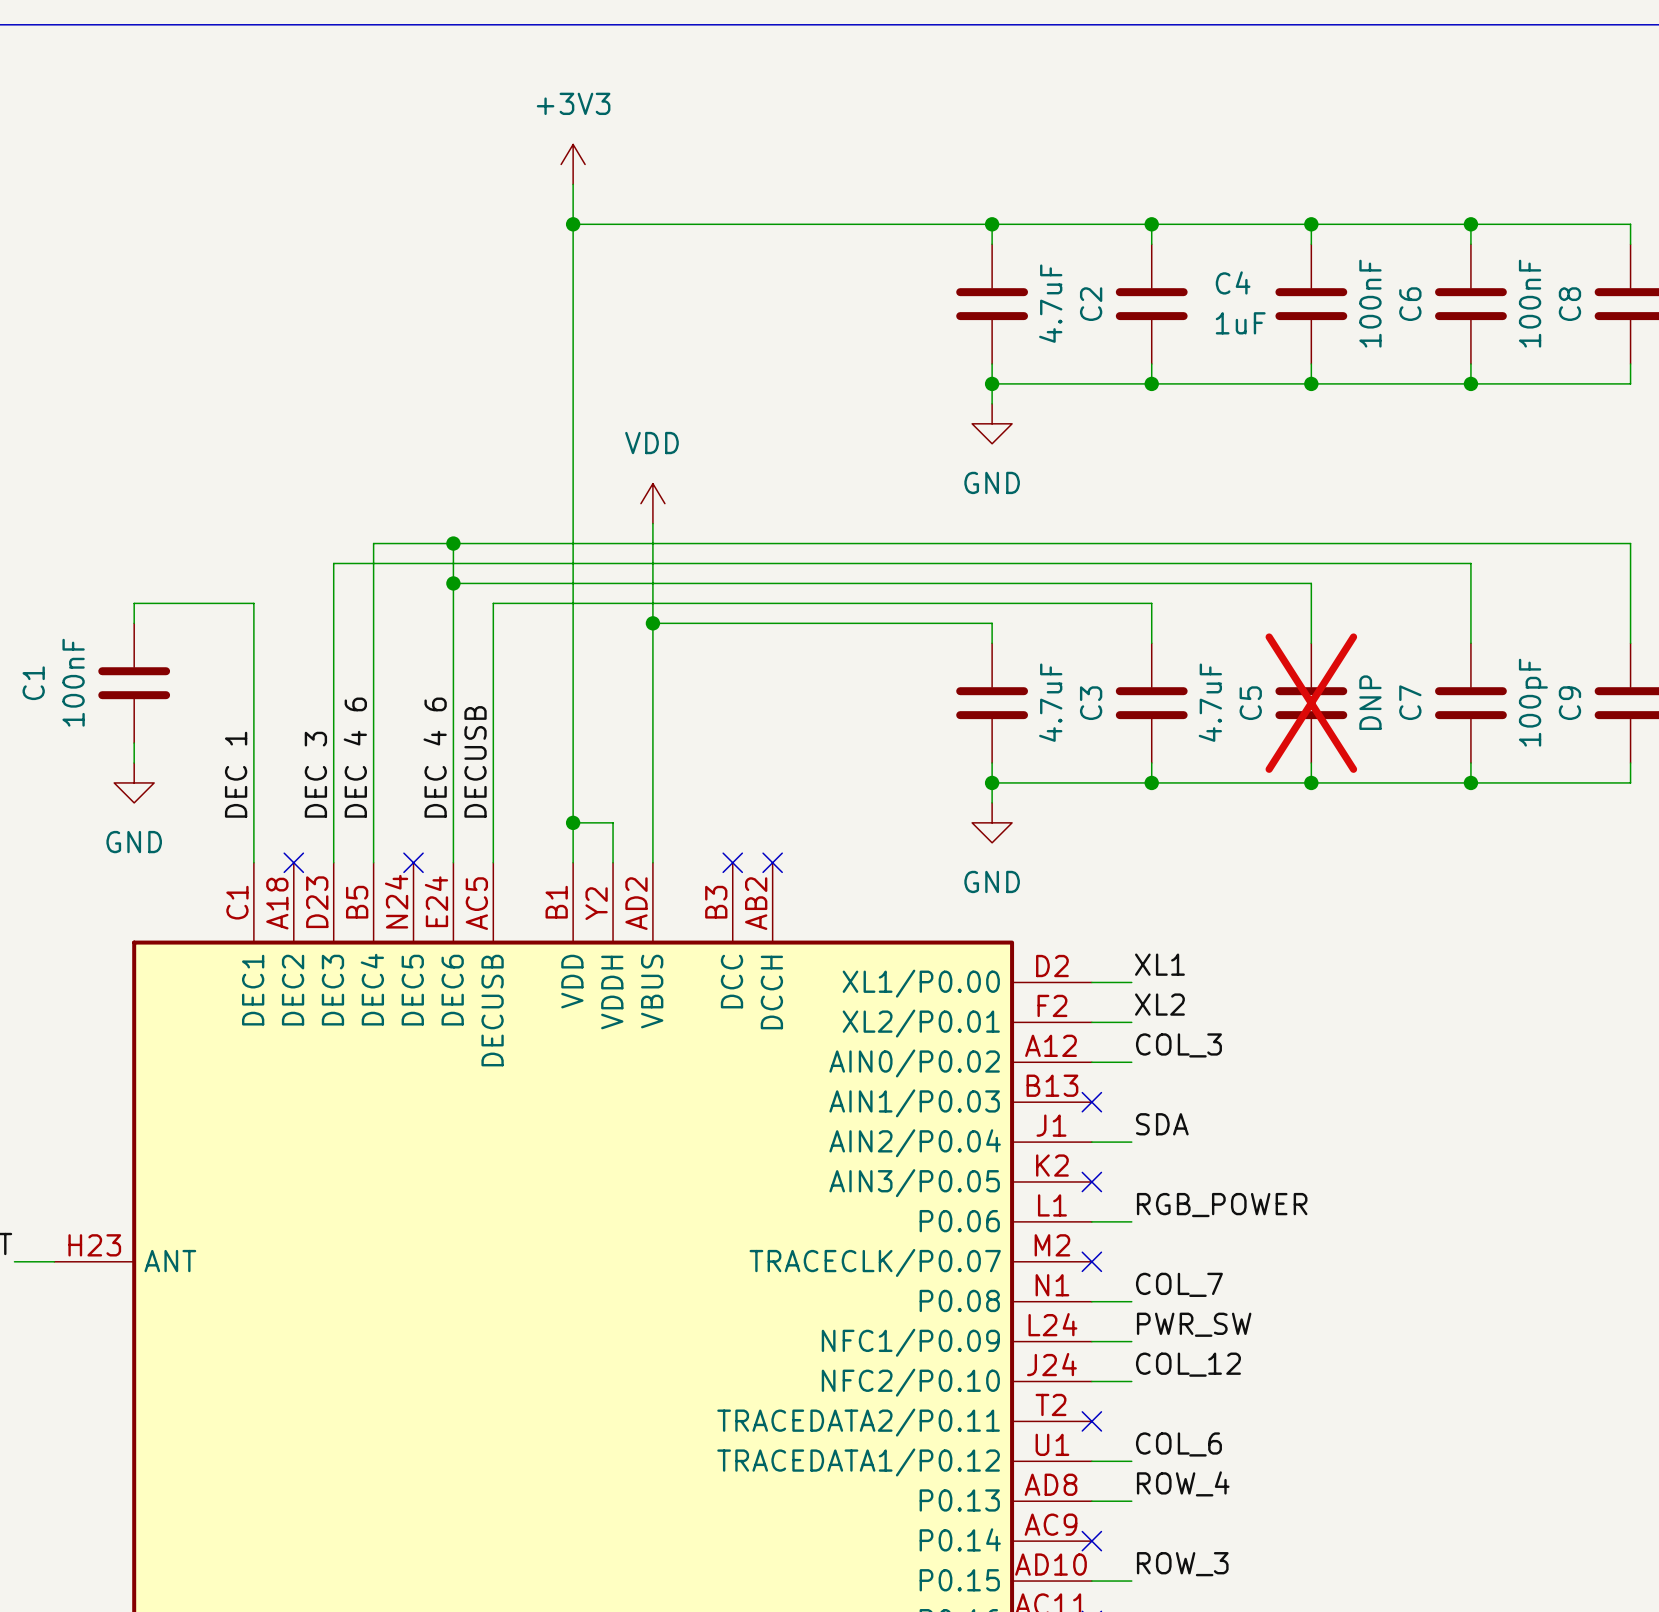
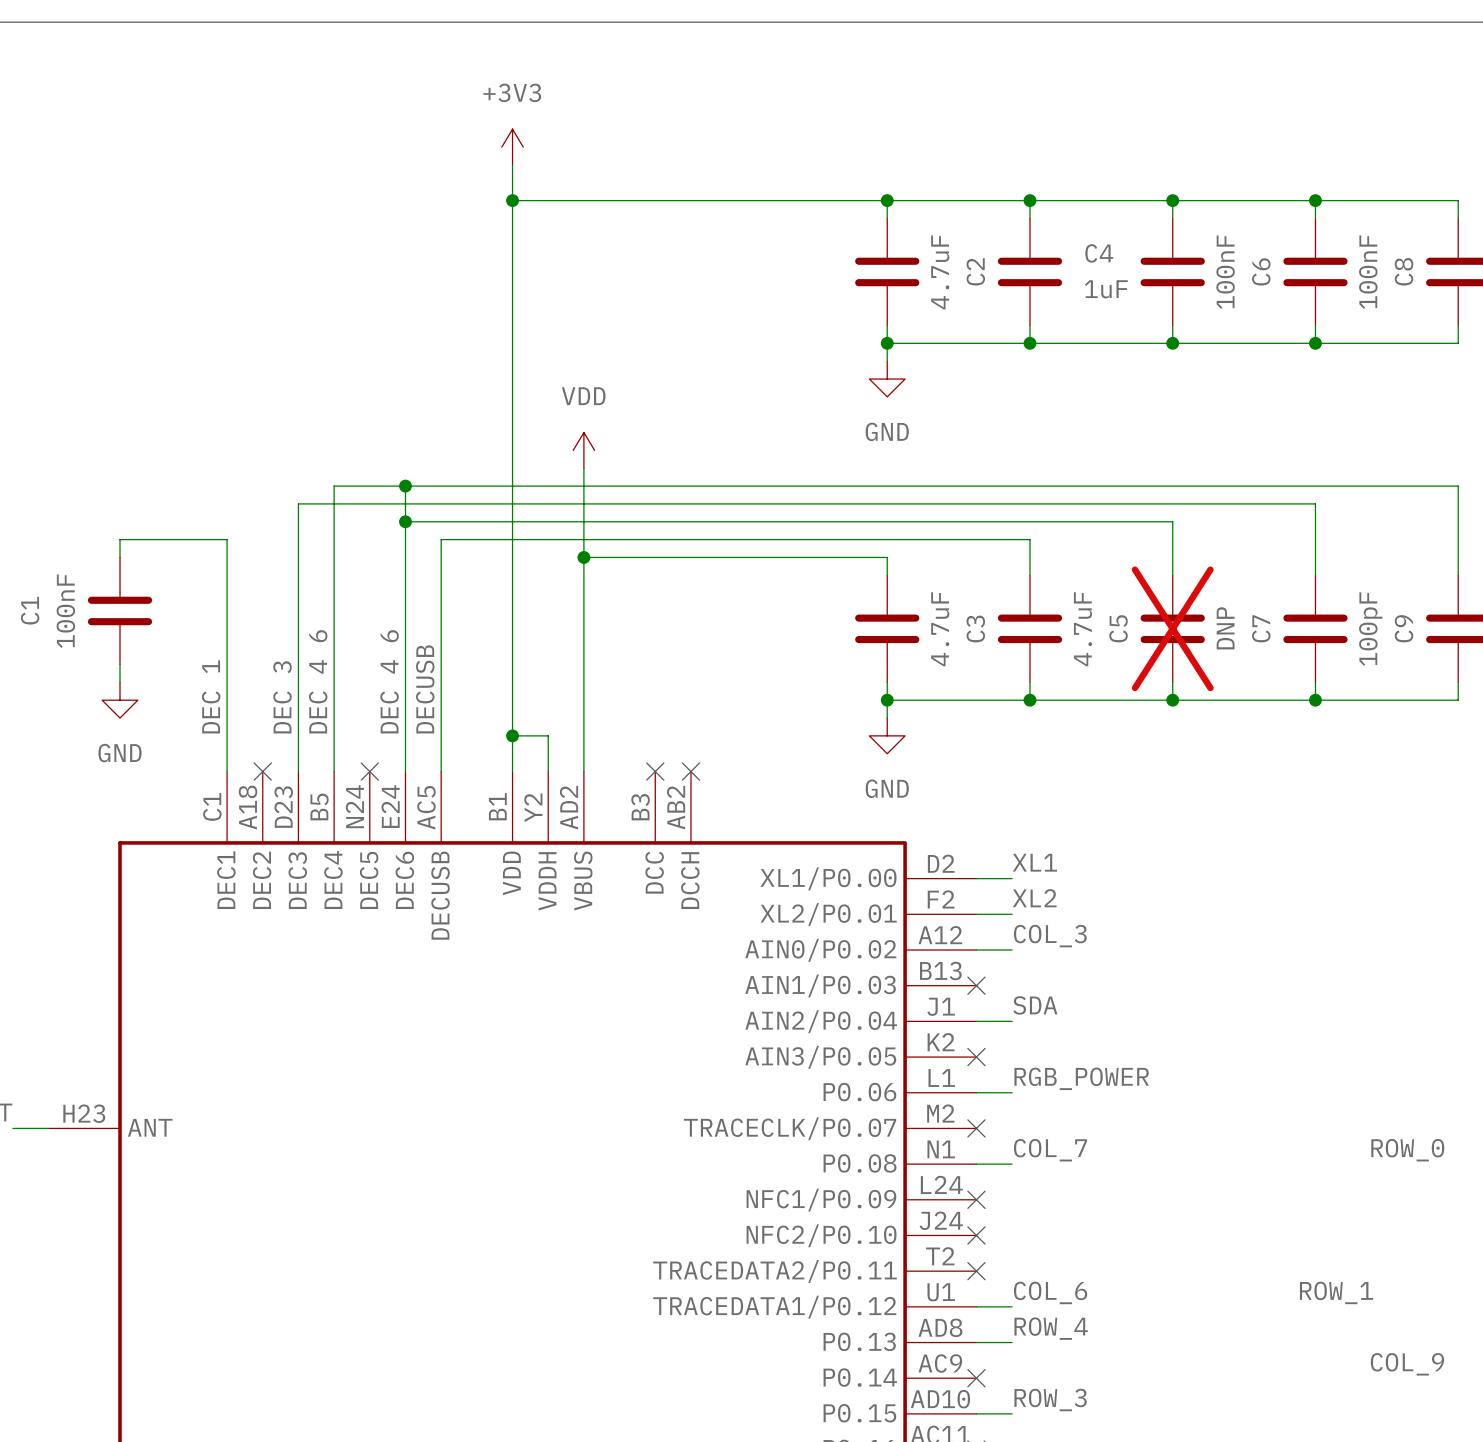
label: none -> ROW_0 (1407, 1150)
label: PWR_SW (1194, 1324) -> none
wire: (1091, 1341) (1131, 1341) -> none
no-connect mark: none -> (976, 1199)
label: COL_12 (1188, 1364) -> none
wire: (1091, 1381) (1131, 1381) -> none
no-connect mark: none -> (976, 1235)
label: none -> ROW_1 (1336, 1292)
label: none -> COL_9 (1407, 1364)

